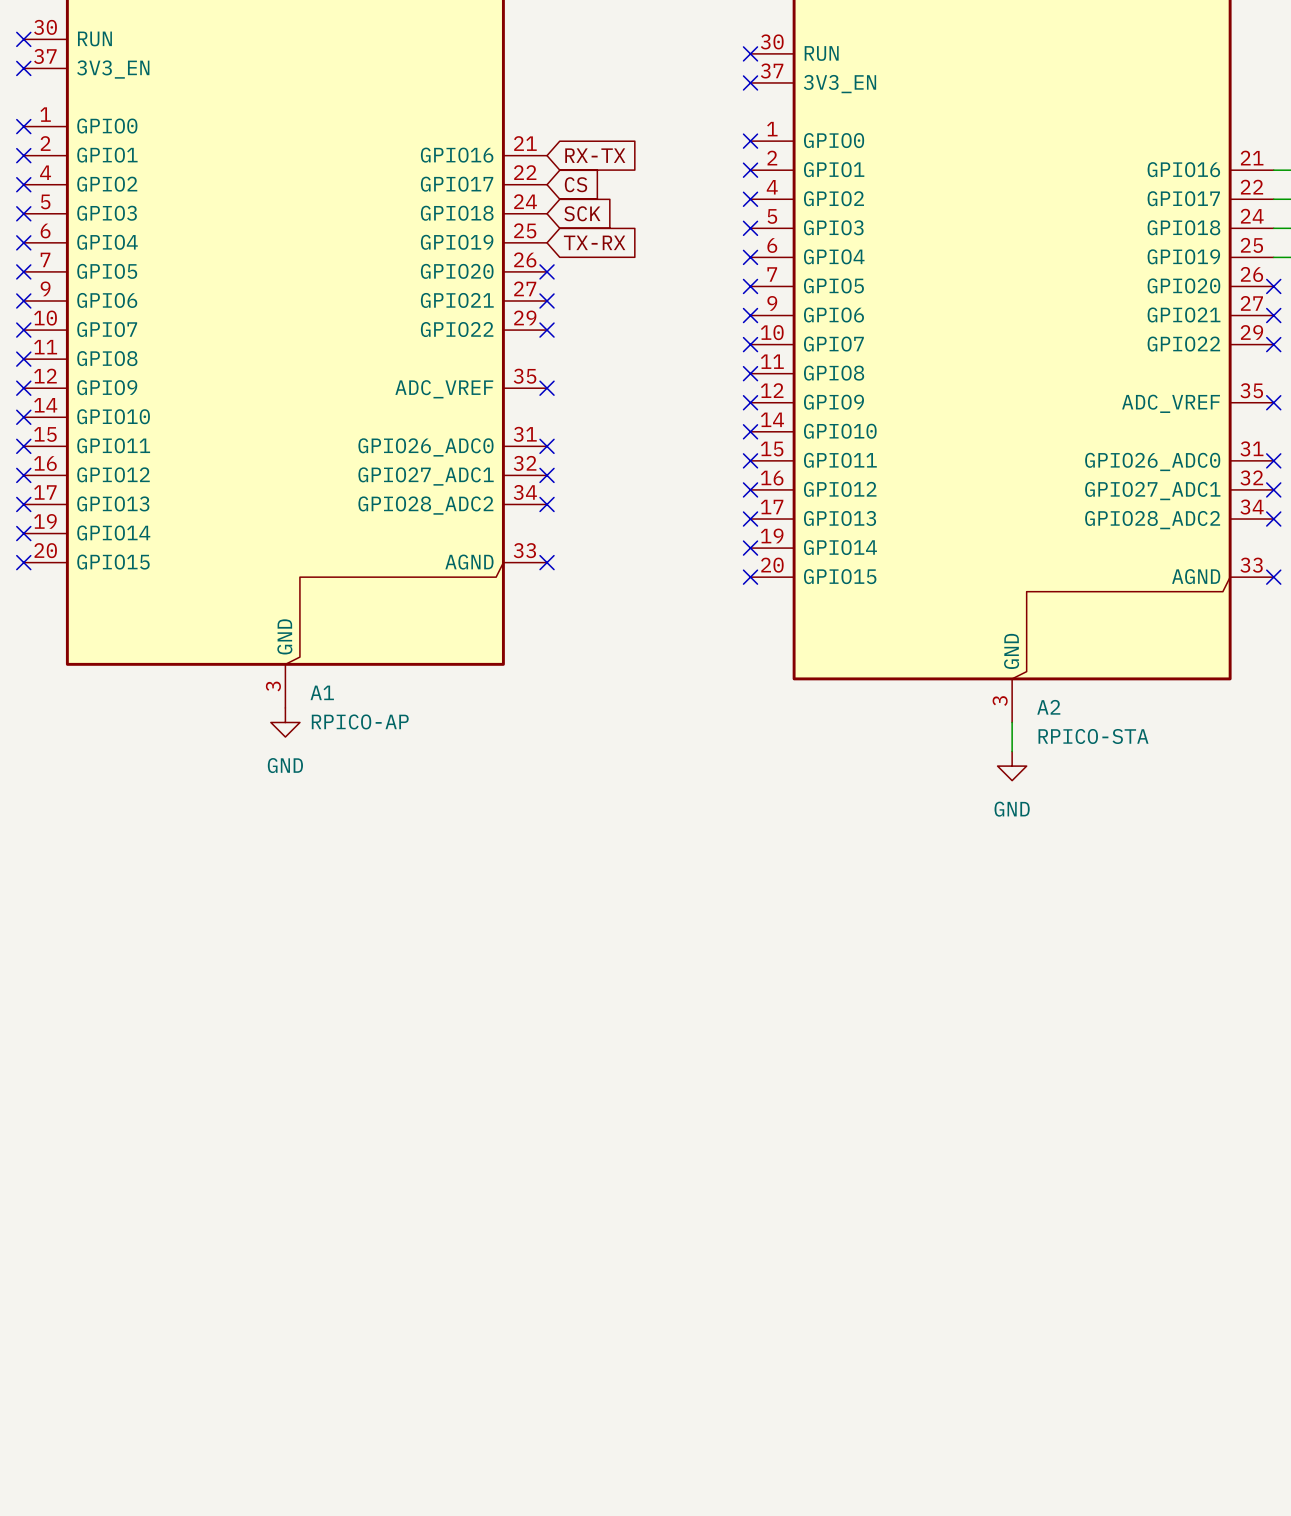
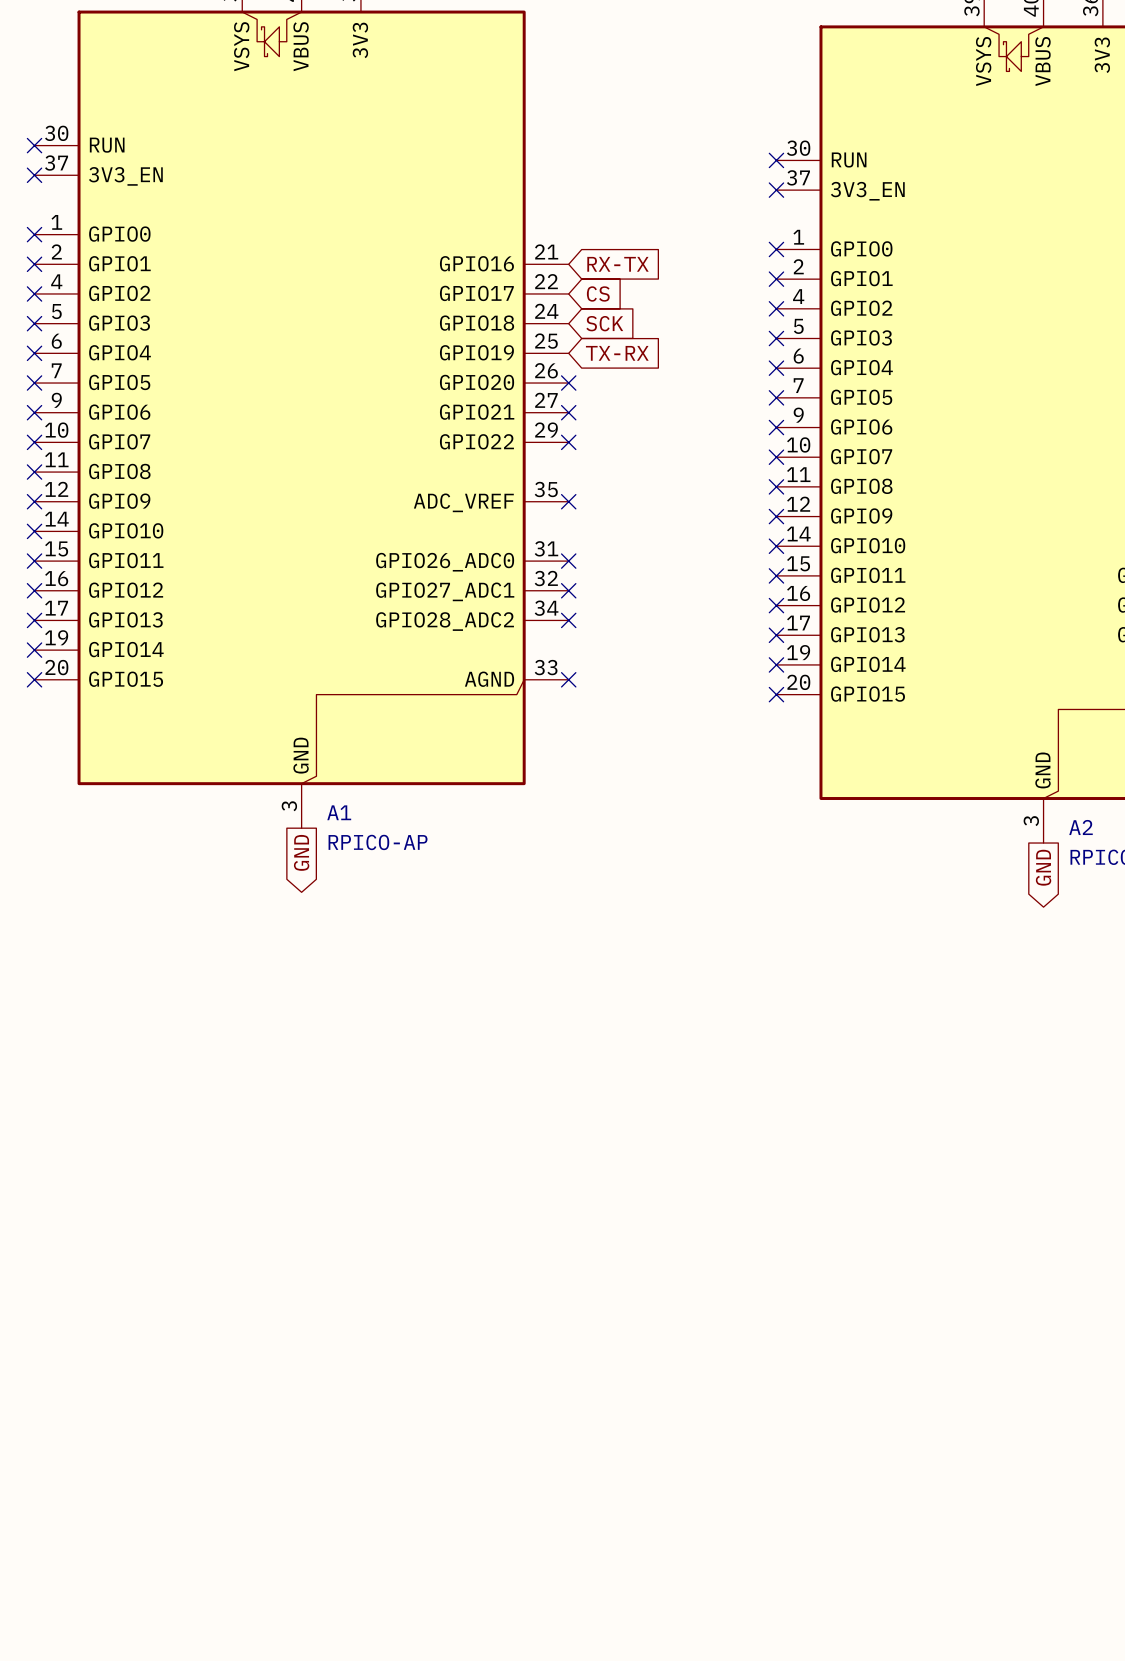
power symbol: GND (285, 722) -> none
wire: (1012, 722) (1012, 751) -> none
global label: none -> GND (301, 852)
global label: none -> GND (1043, 867)
power symbol: GND (1012, 766) -> none

